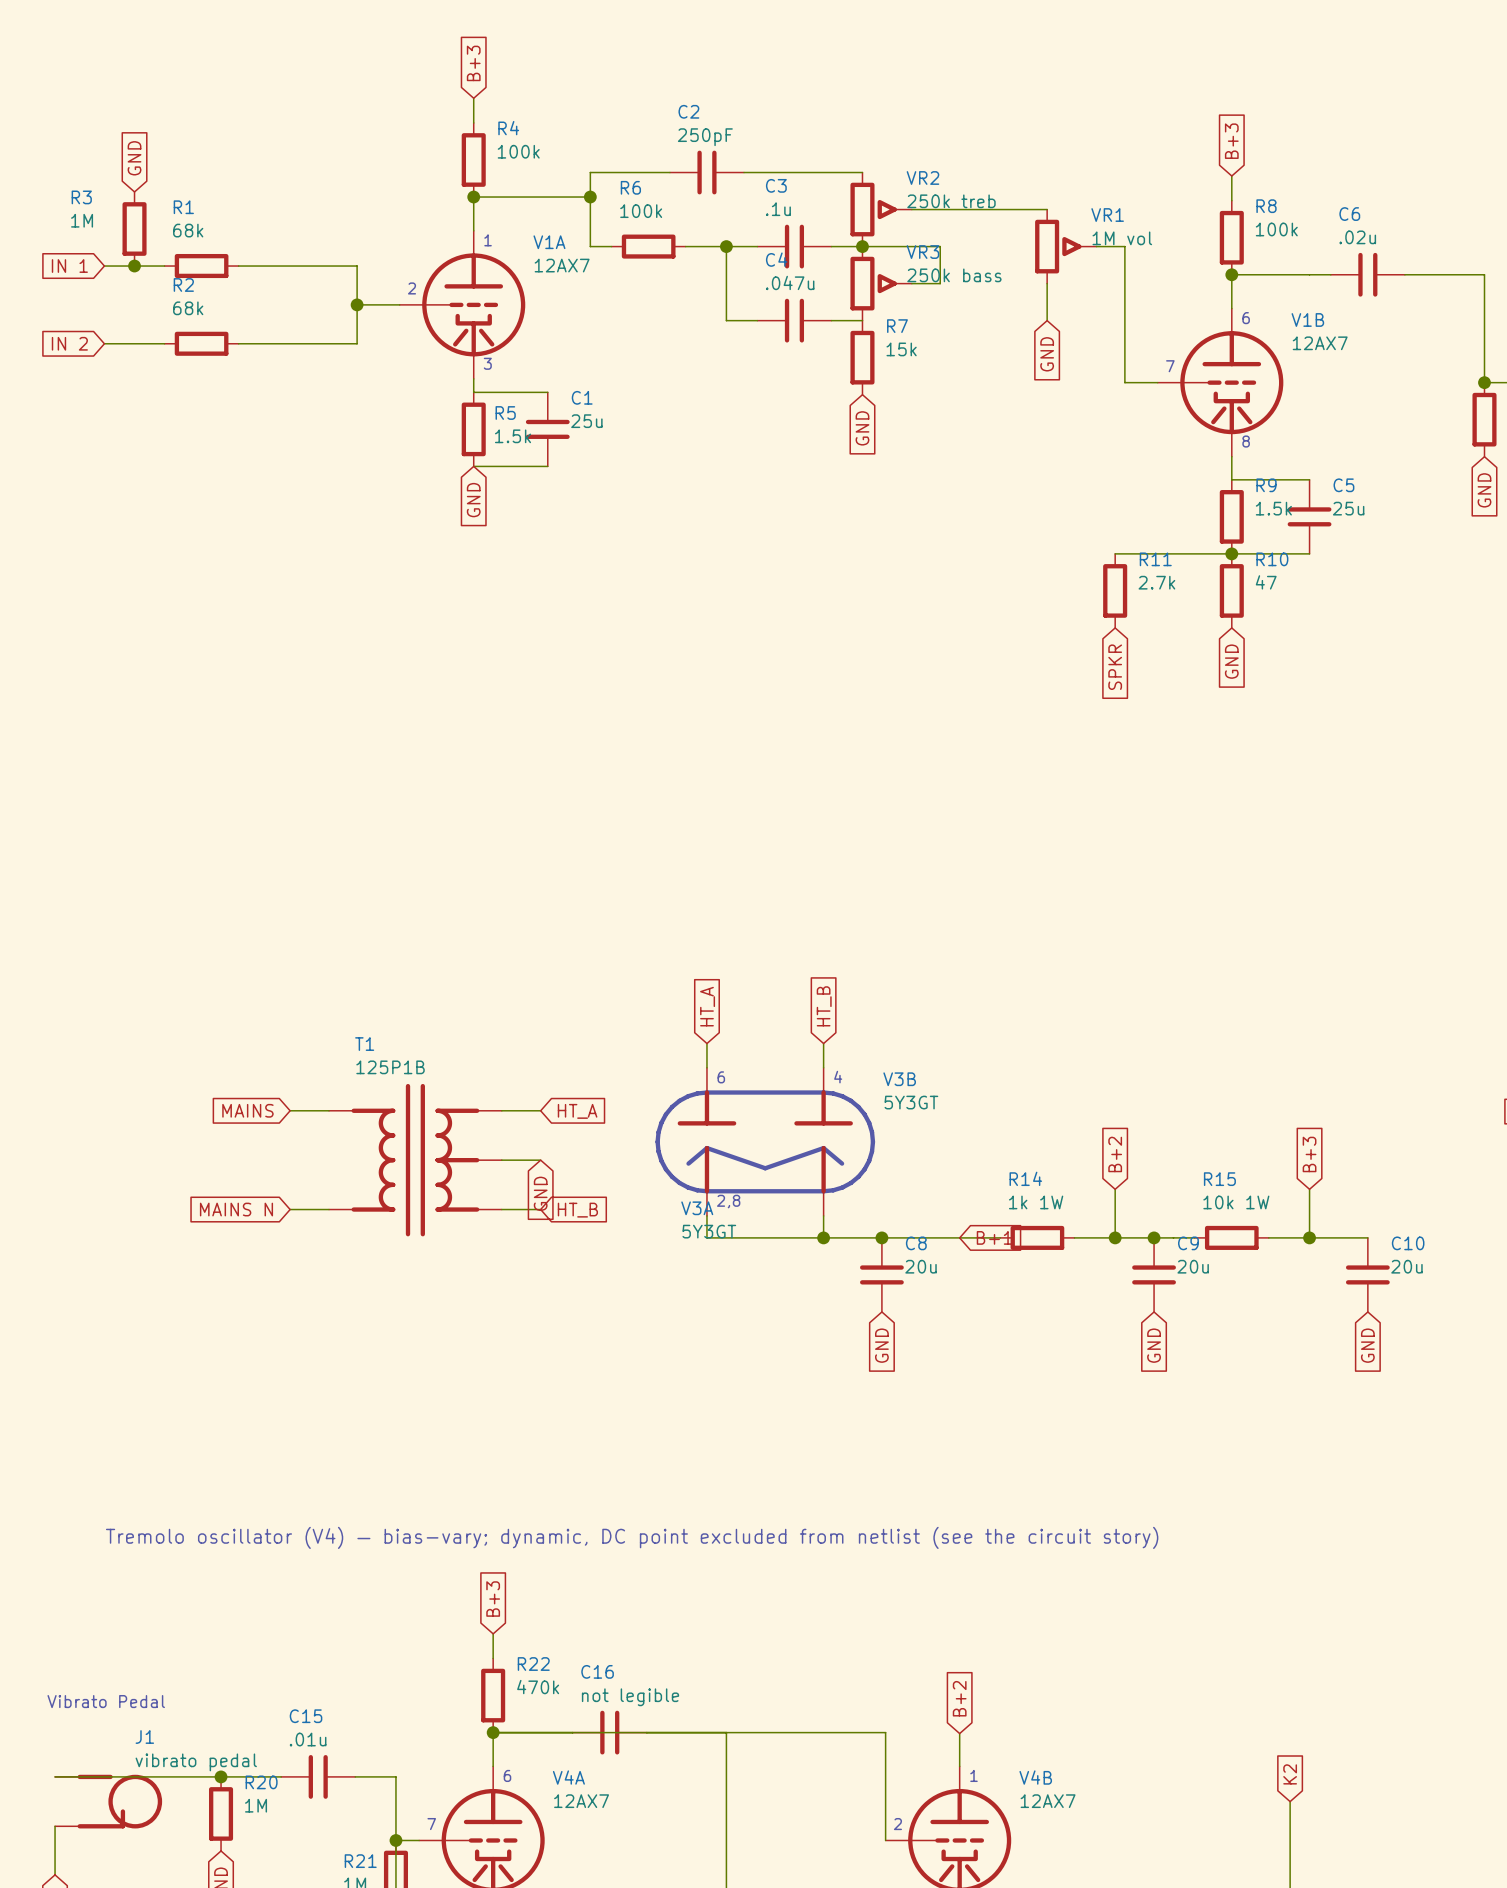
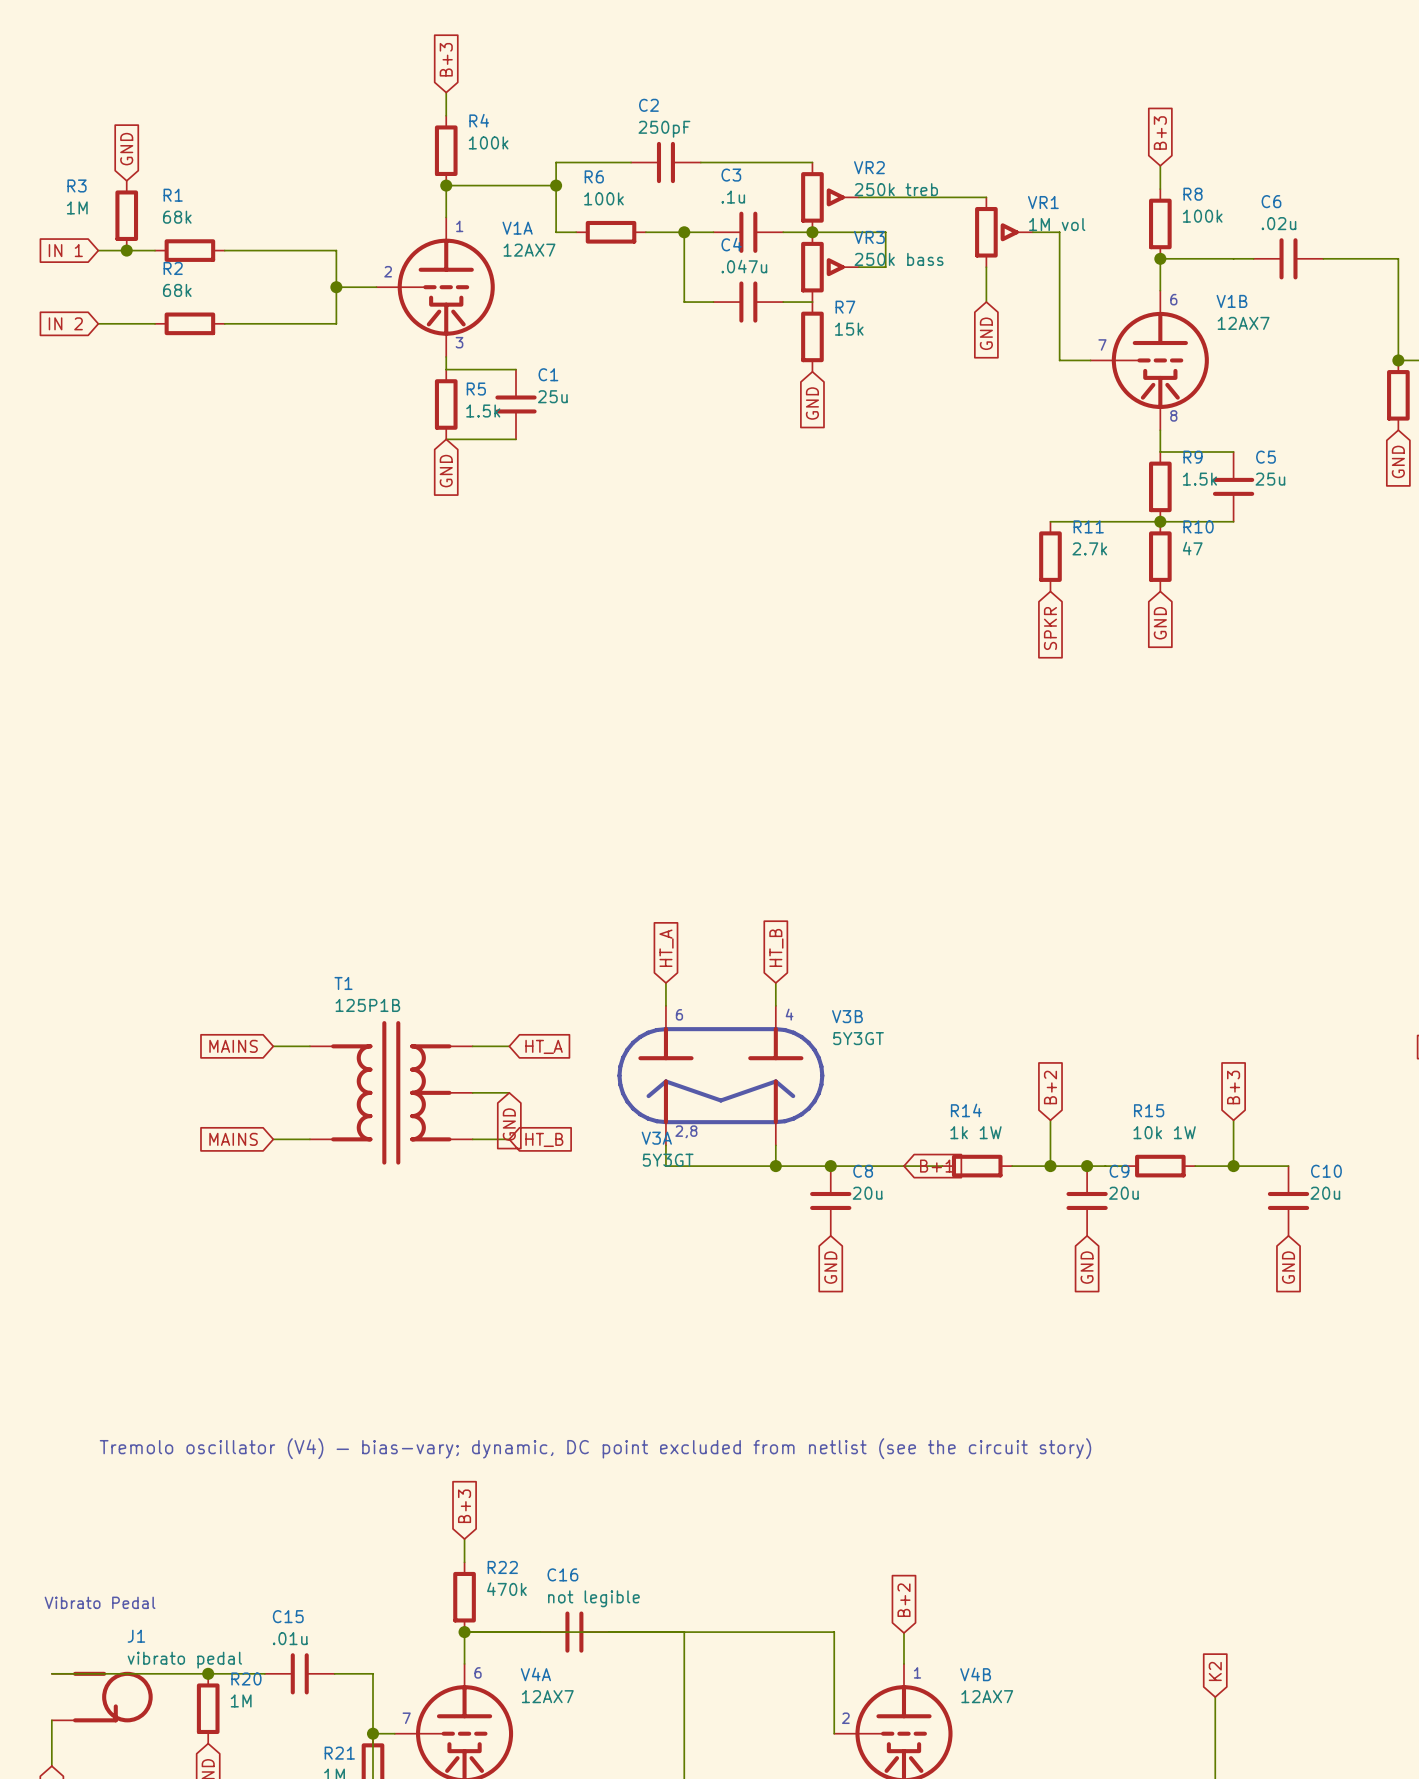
global label: MAINS N (236, 1209) -> MAINS (233, 1139)

